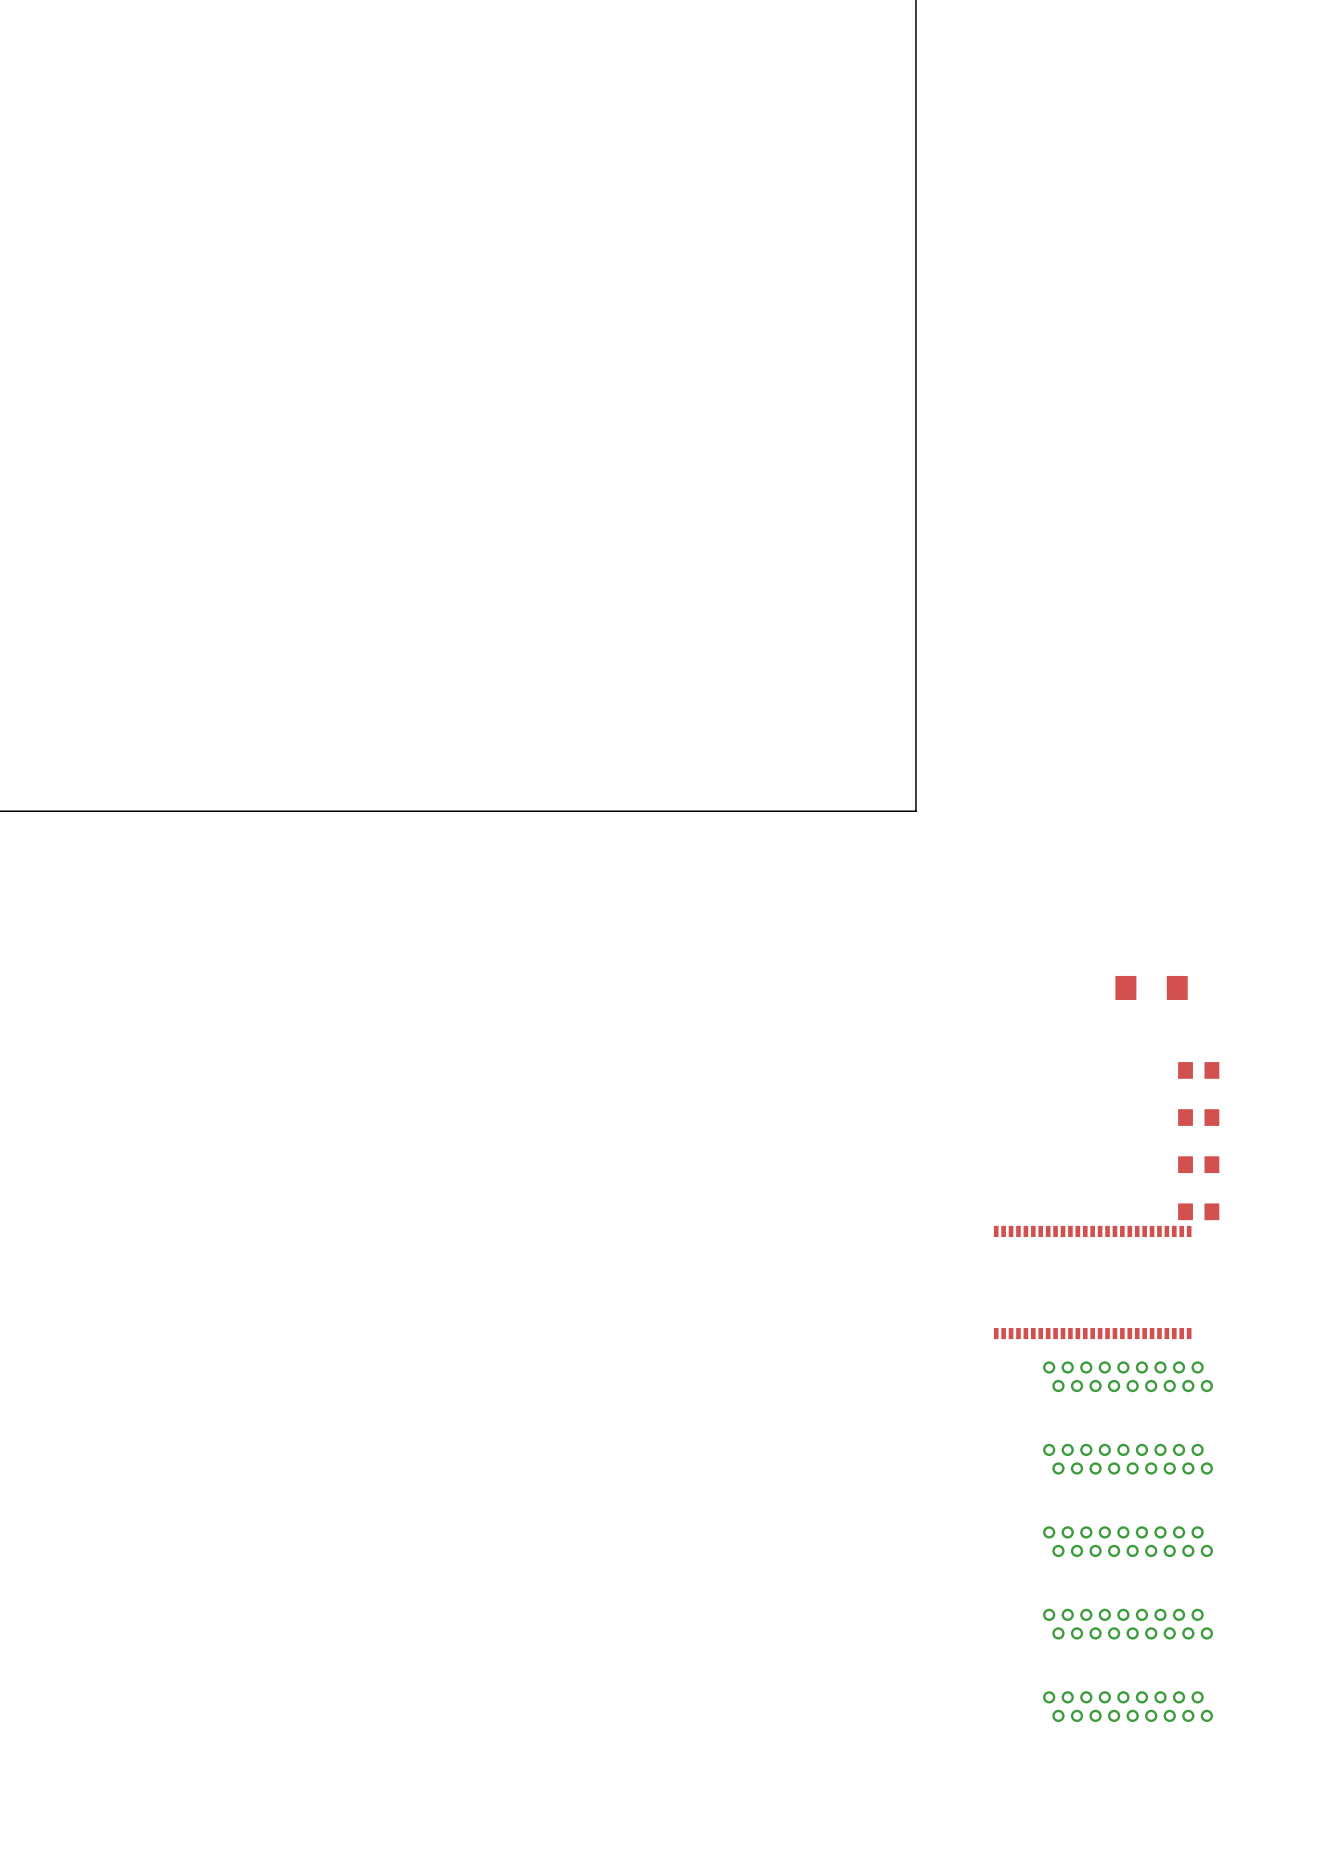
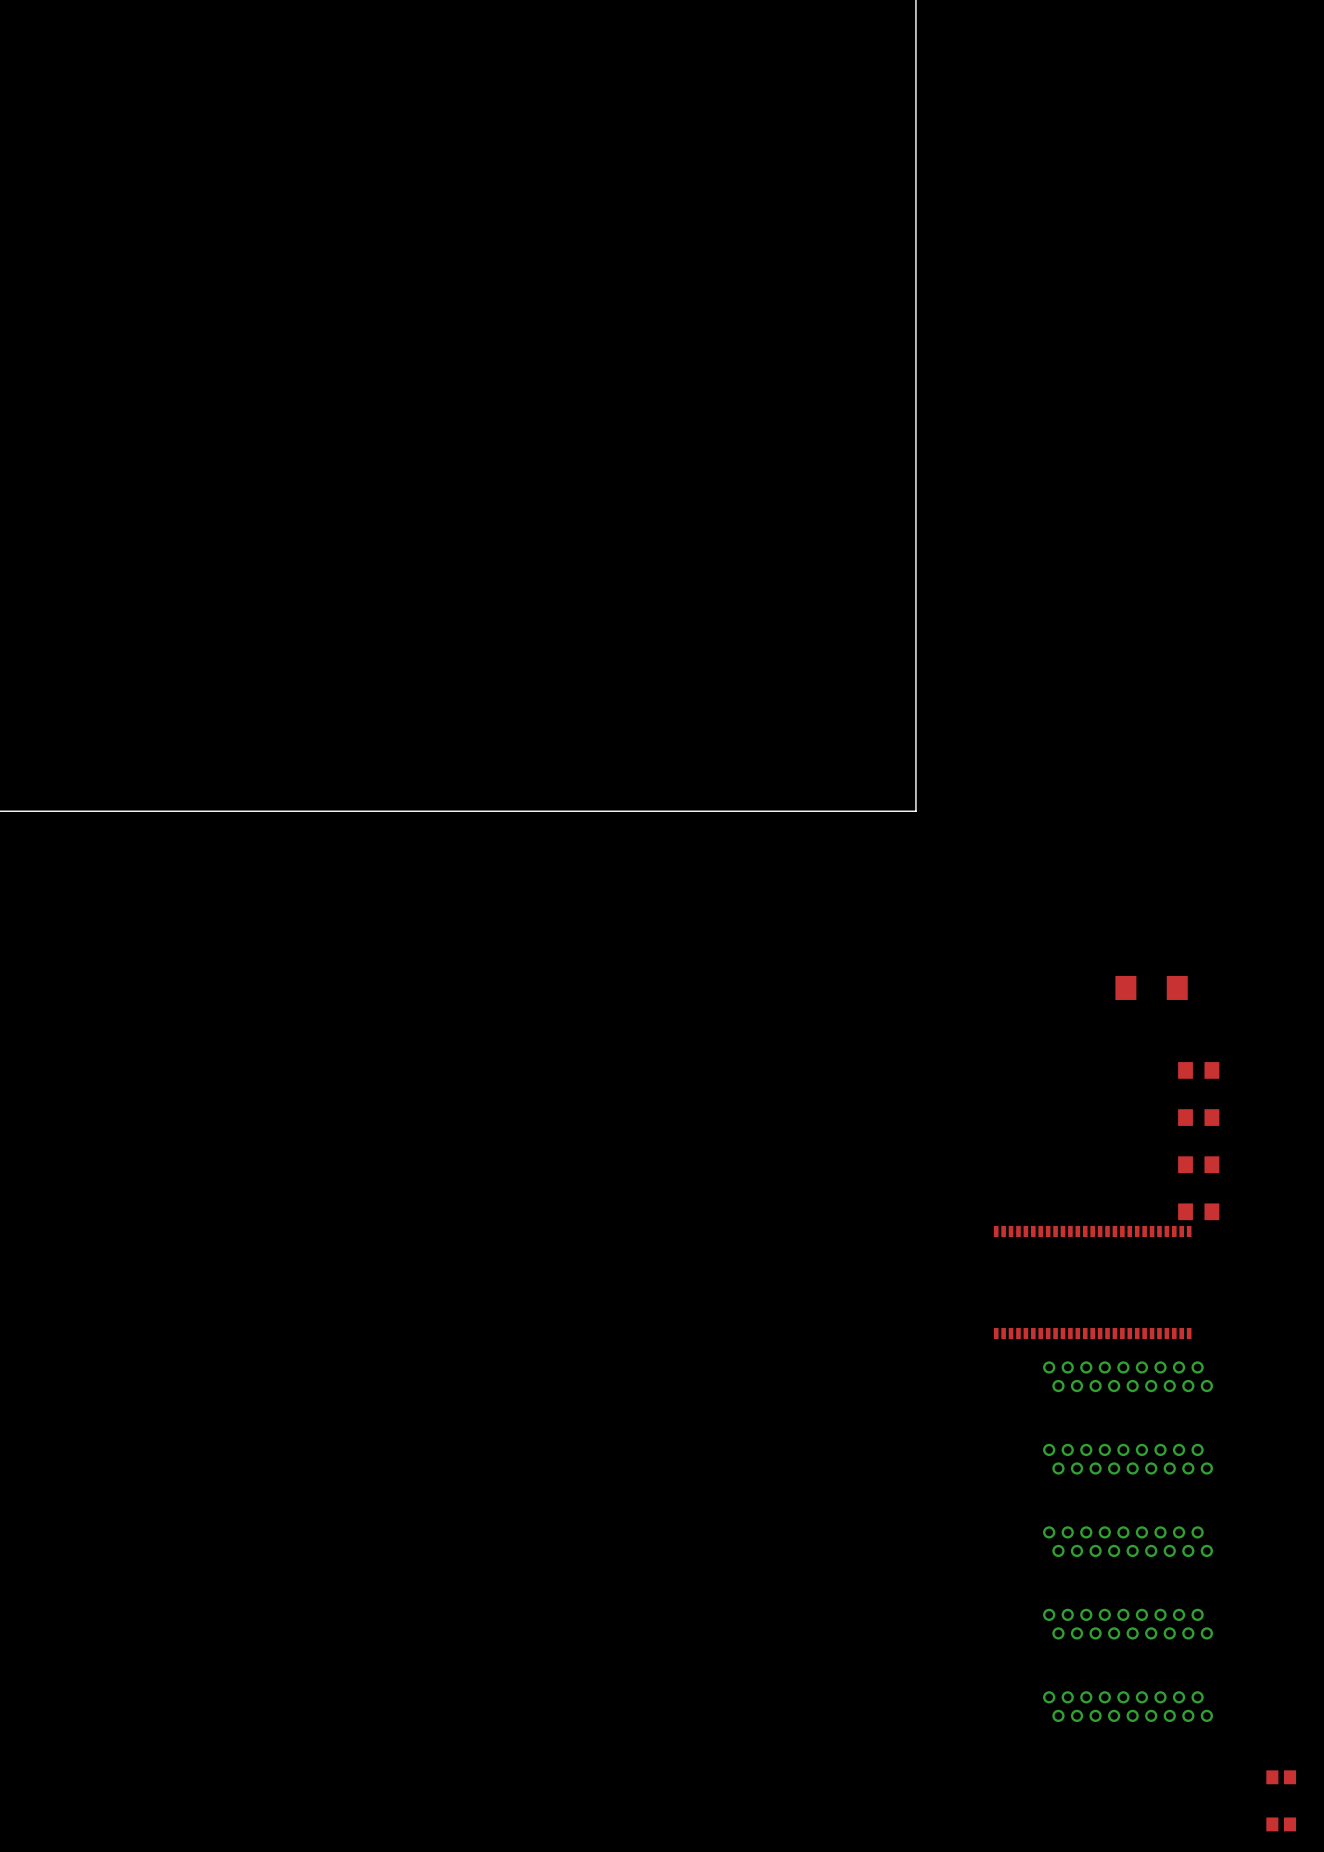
part: none -> (1281, 1777)
part: none -> (1281, 1824)

